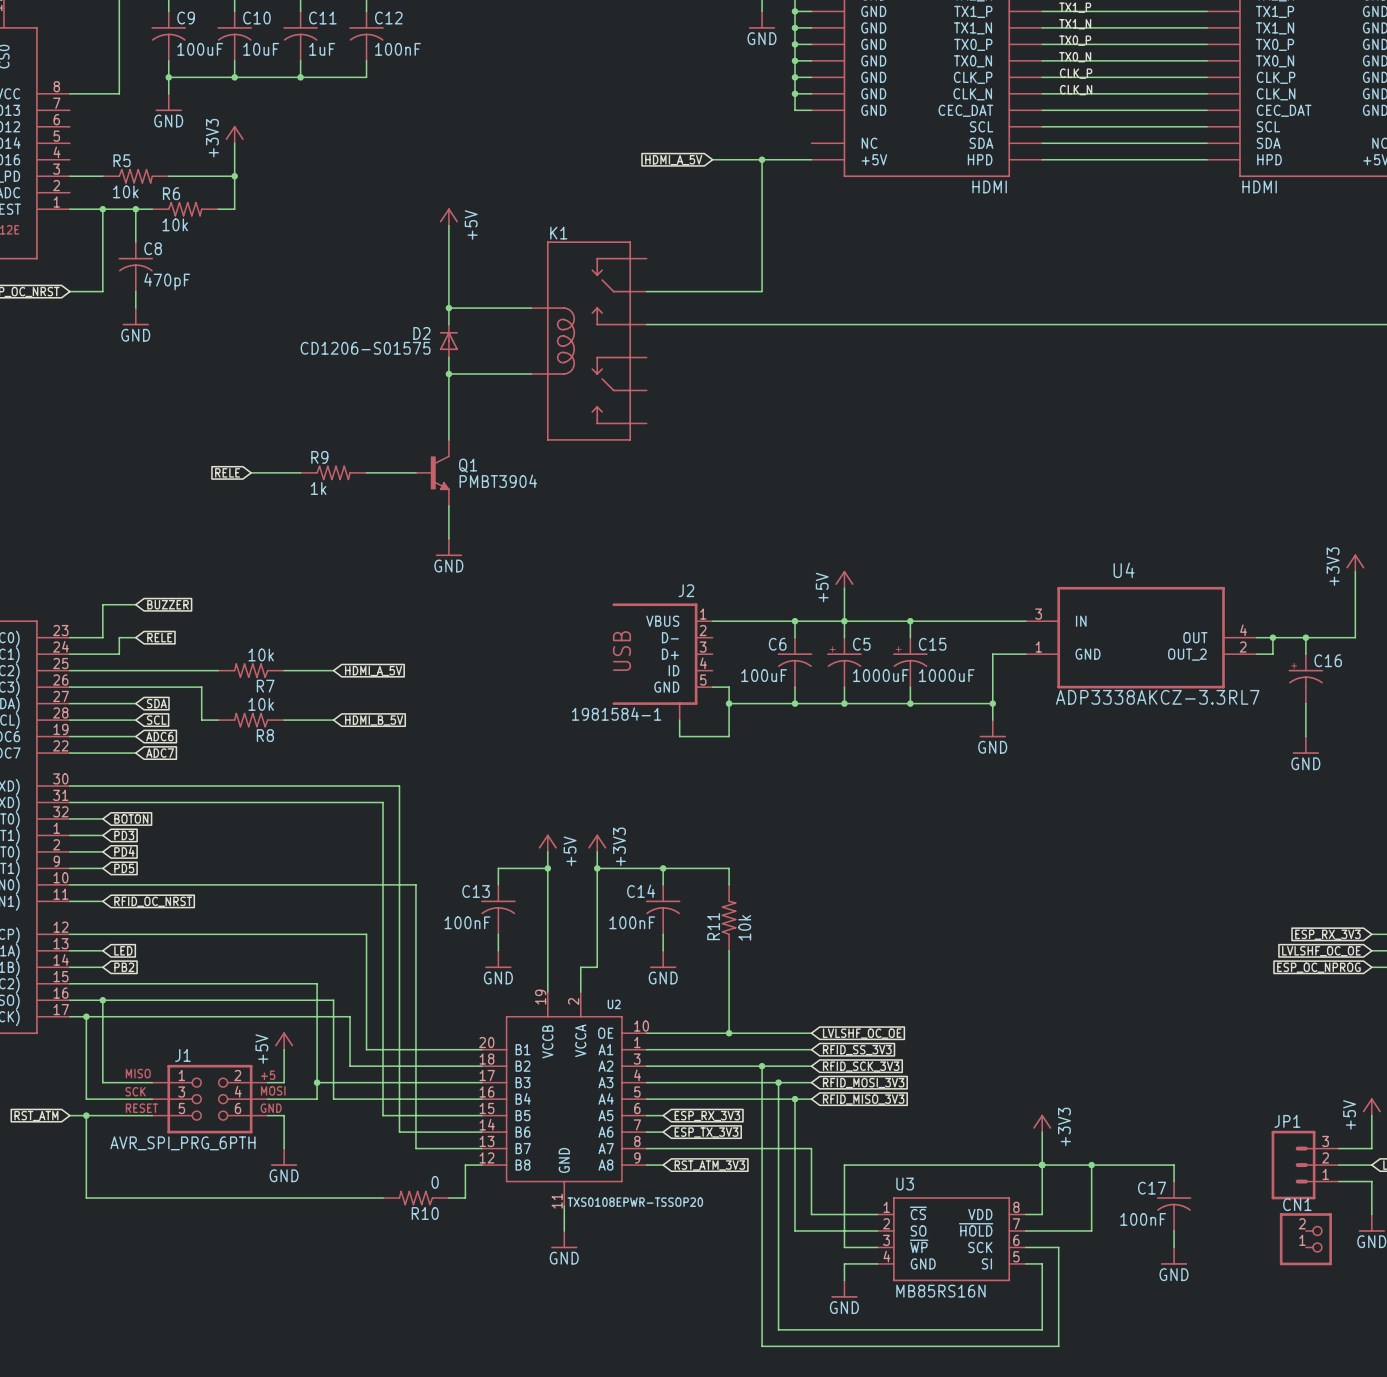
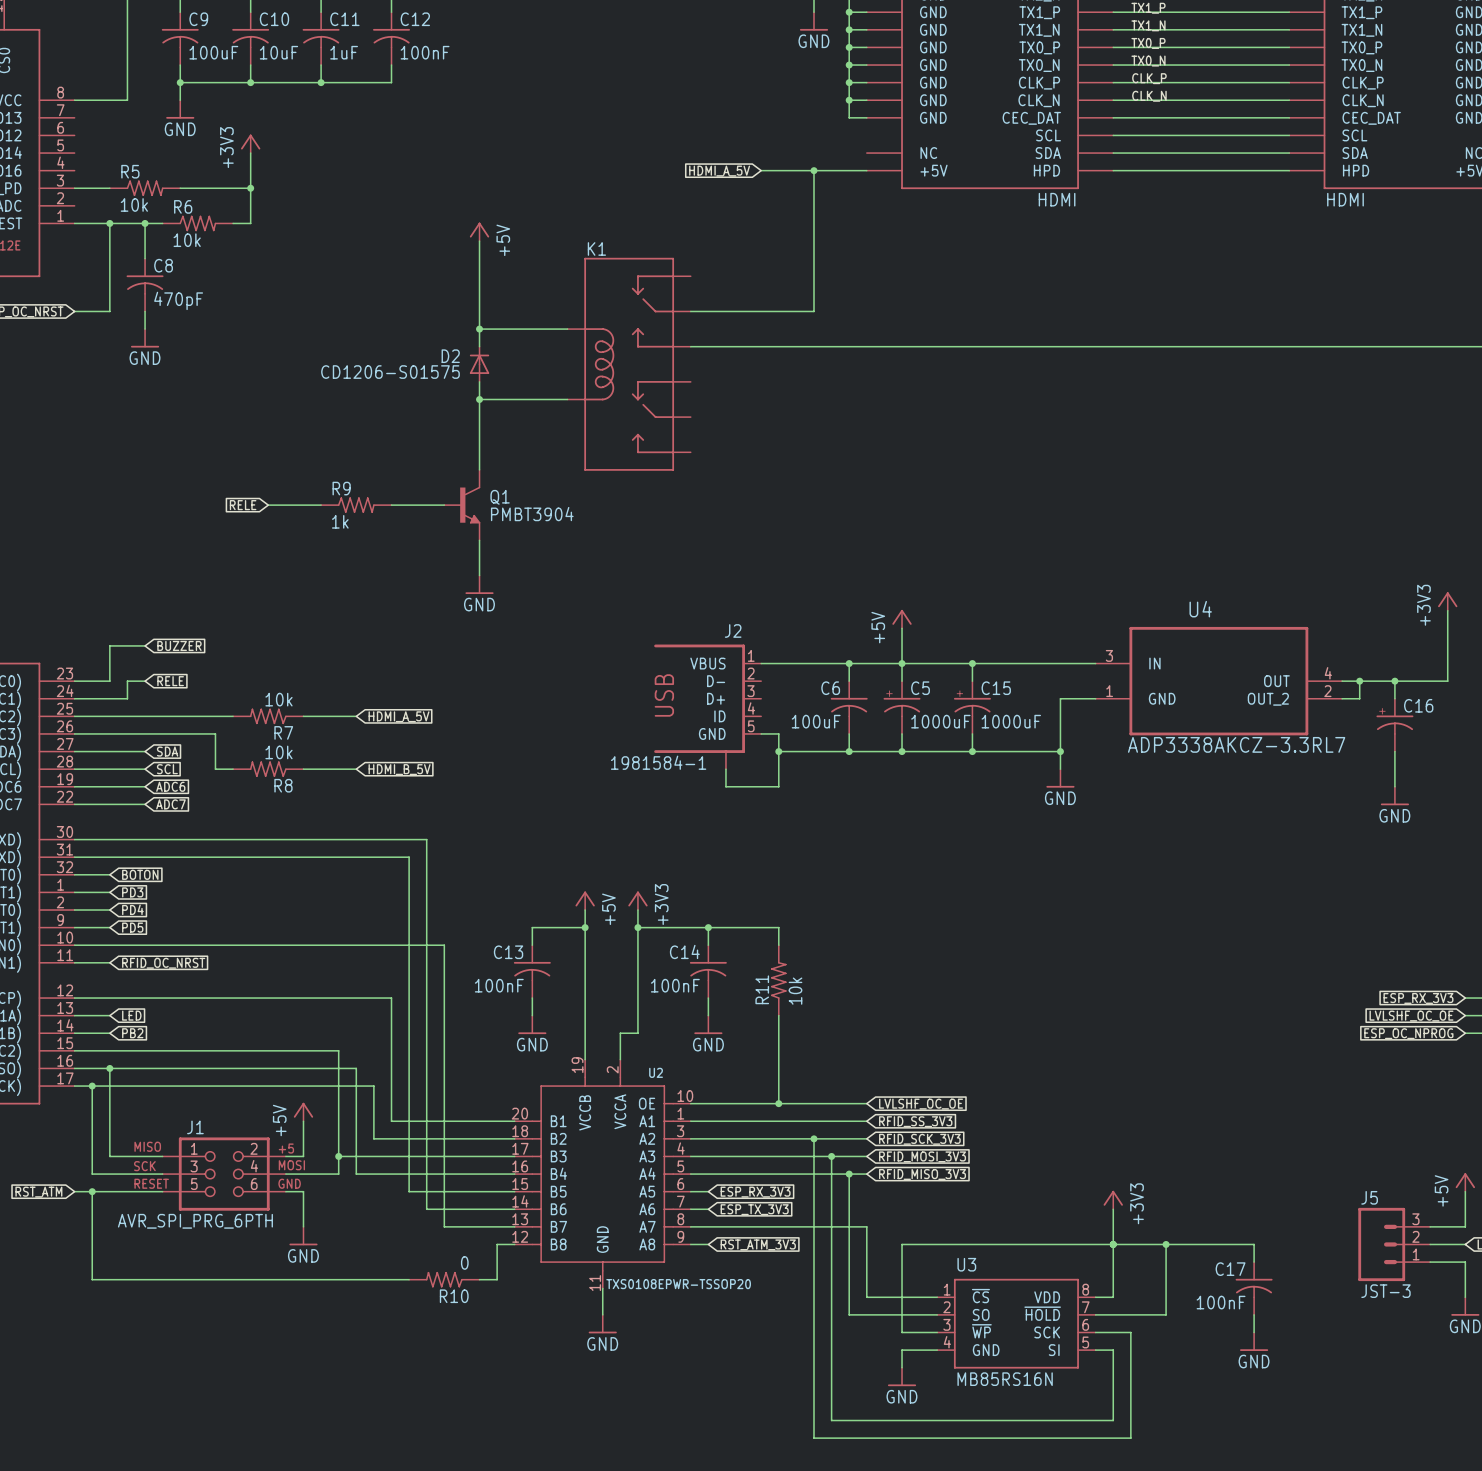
JP1 name: JP1 (1287, 1121) -> J5 (1369, 1197)
JP1 value: none -> JST-3 (1385, 1291)
CN1: (1305, 1239) -> none

